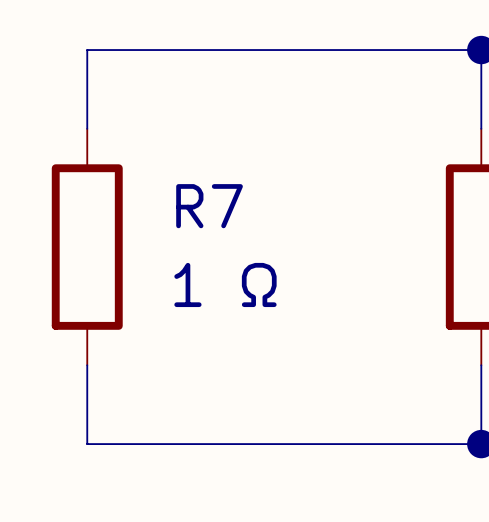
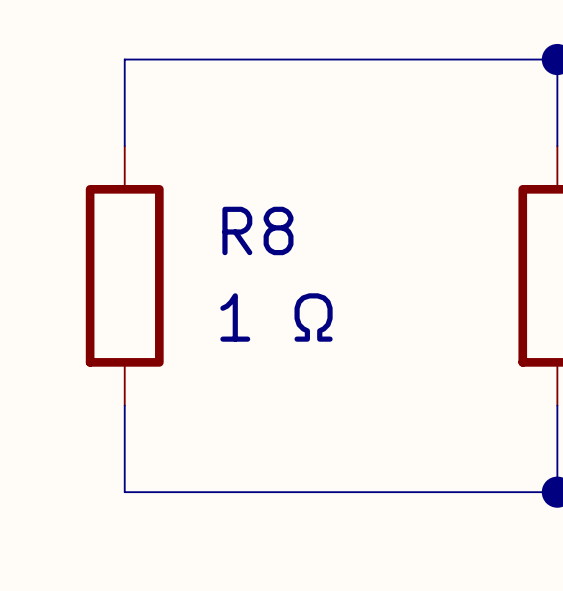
R7 name: R7 (209, 206) -> R8 (257, 230)

